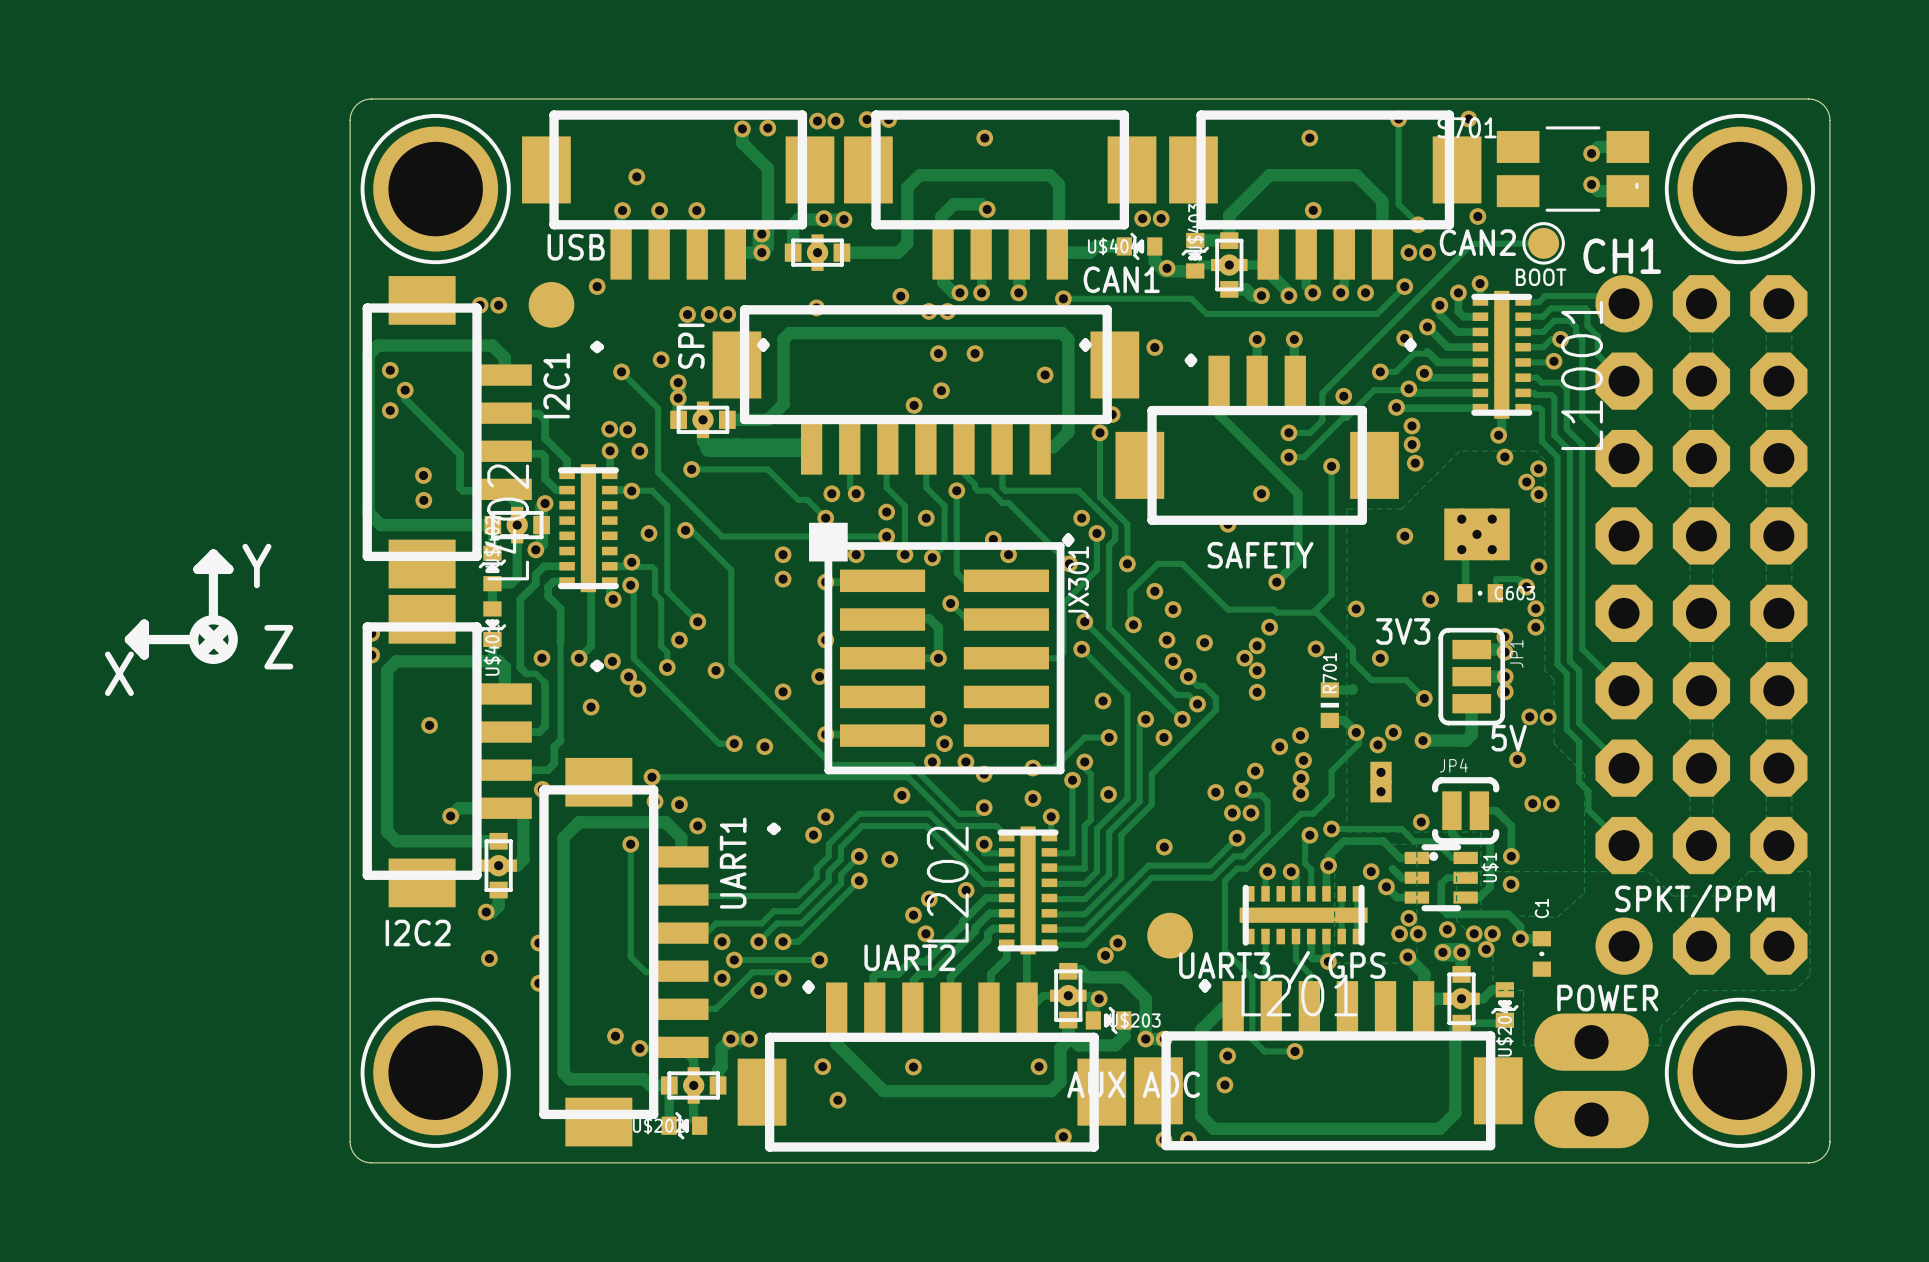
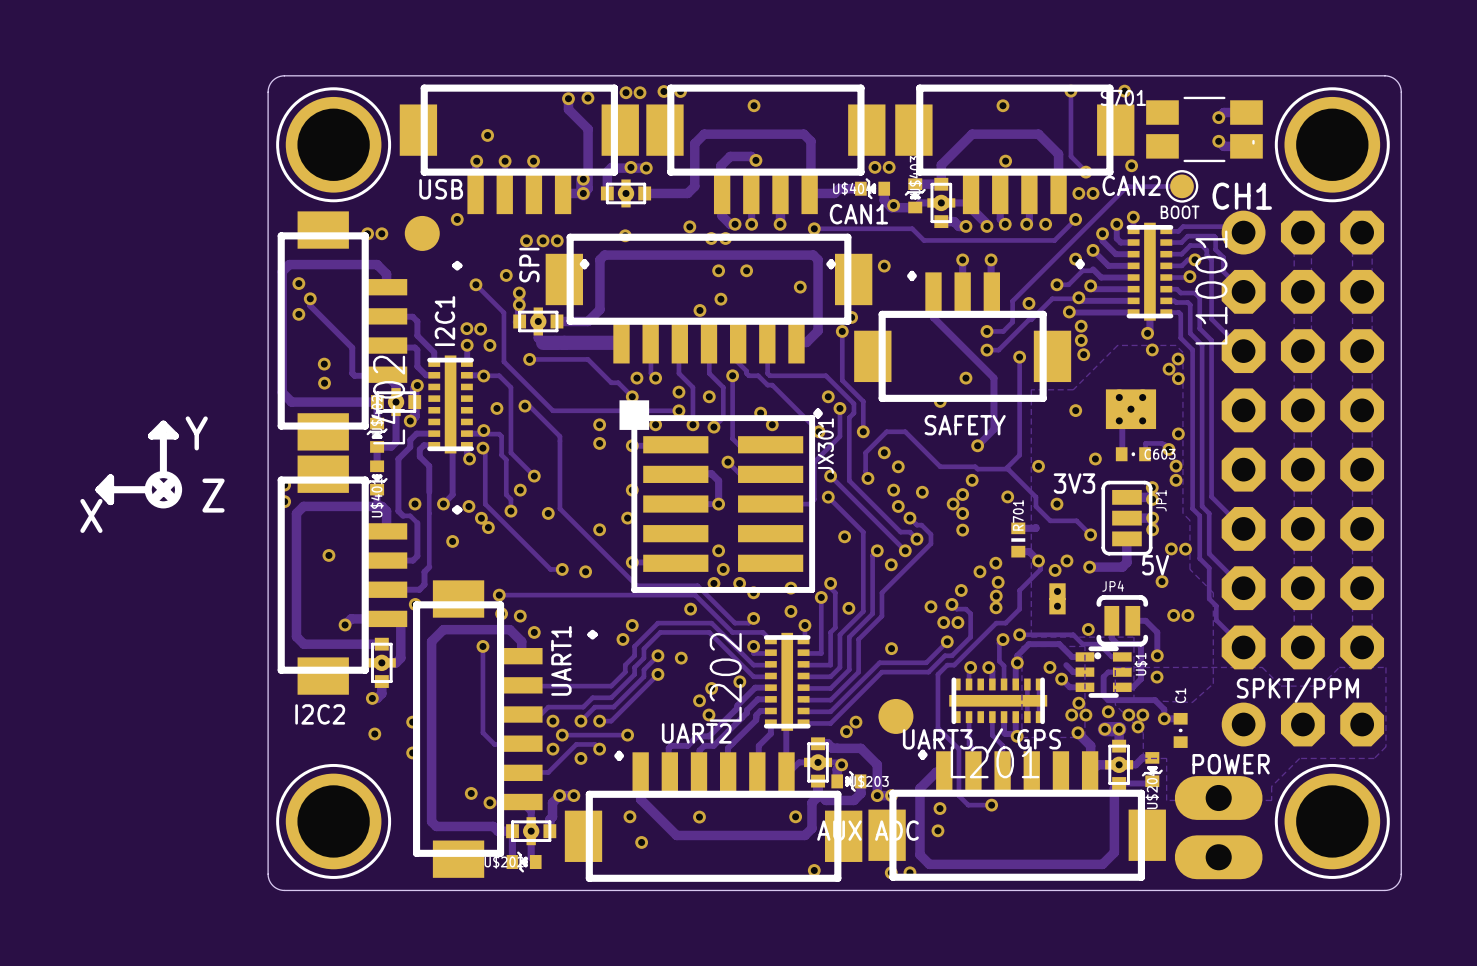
text position: I2C1 (556, 385) -> I2C1 (444, 321)
track: (1109, 737) (1084, 737) (1054, 768) (1032, 768) -> none
via: (1109, 737) -> none

